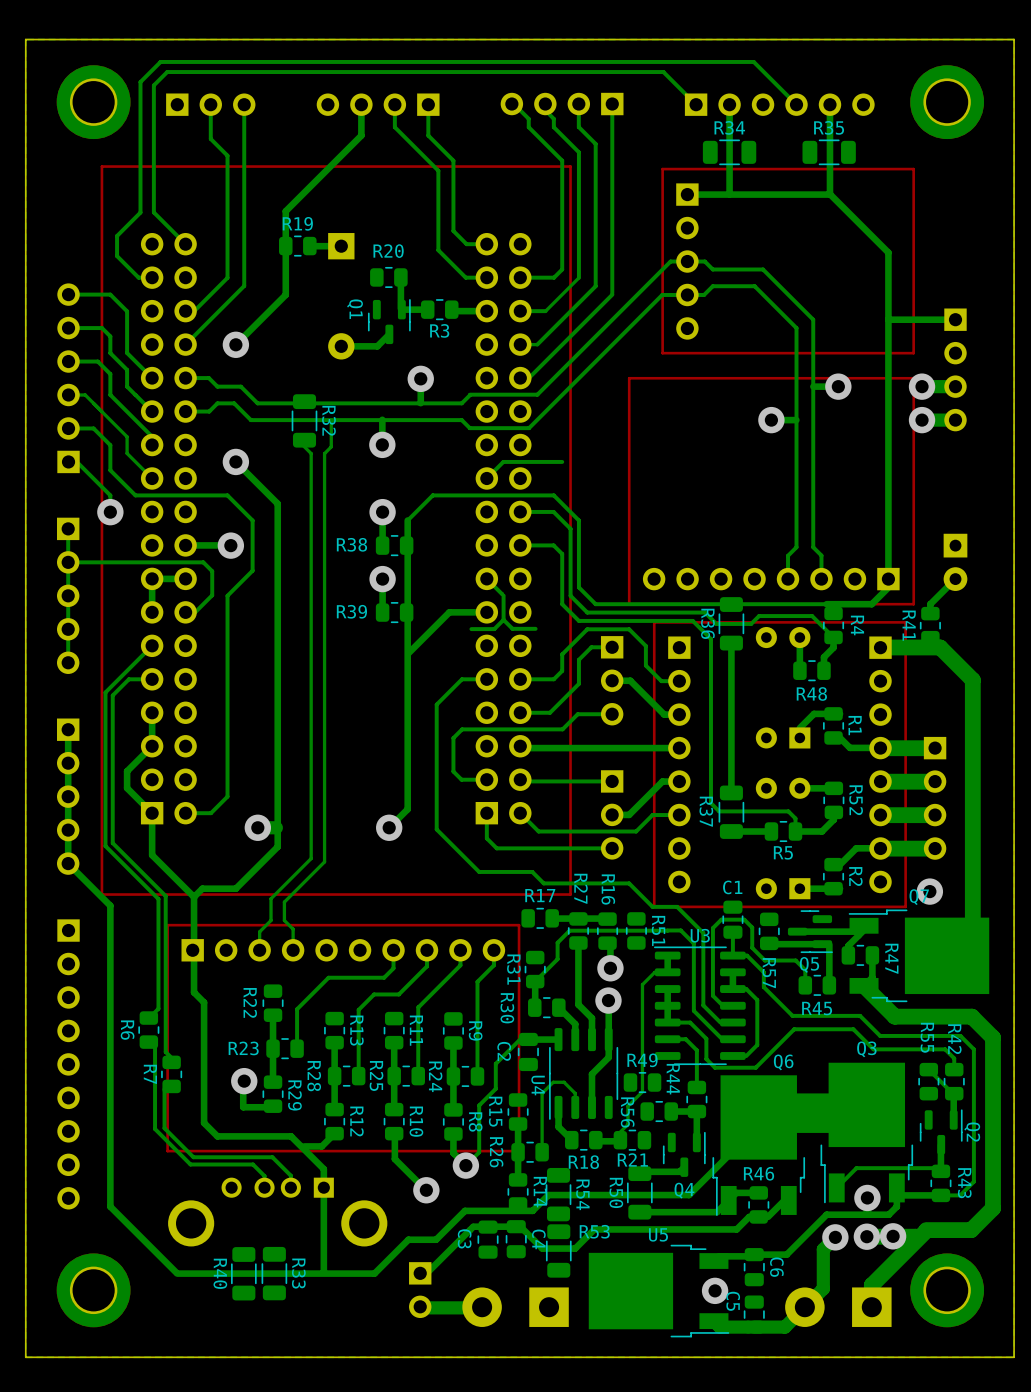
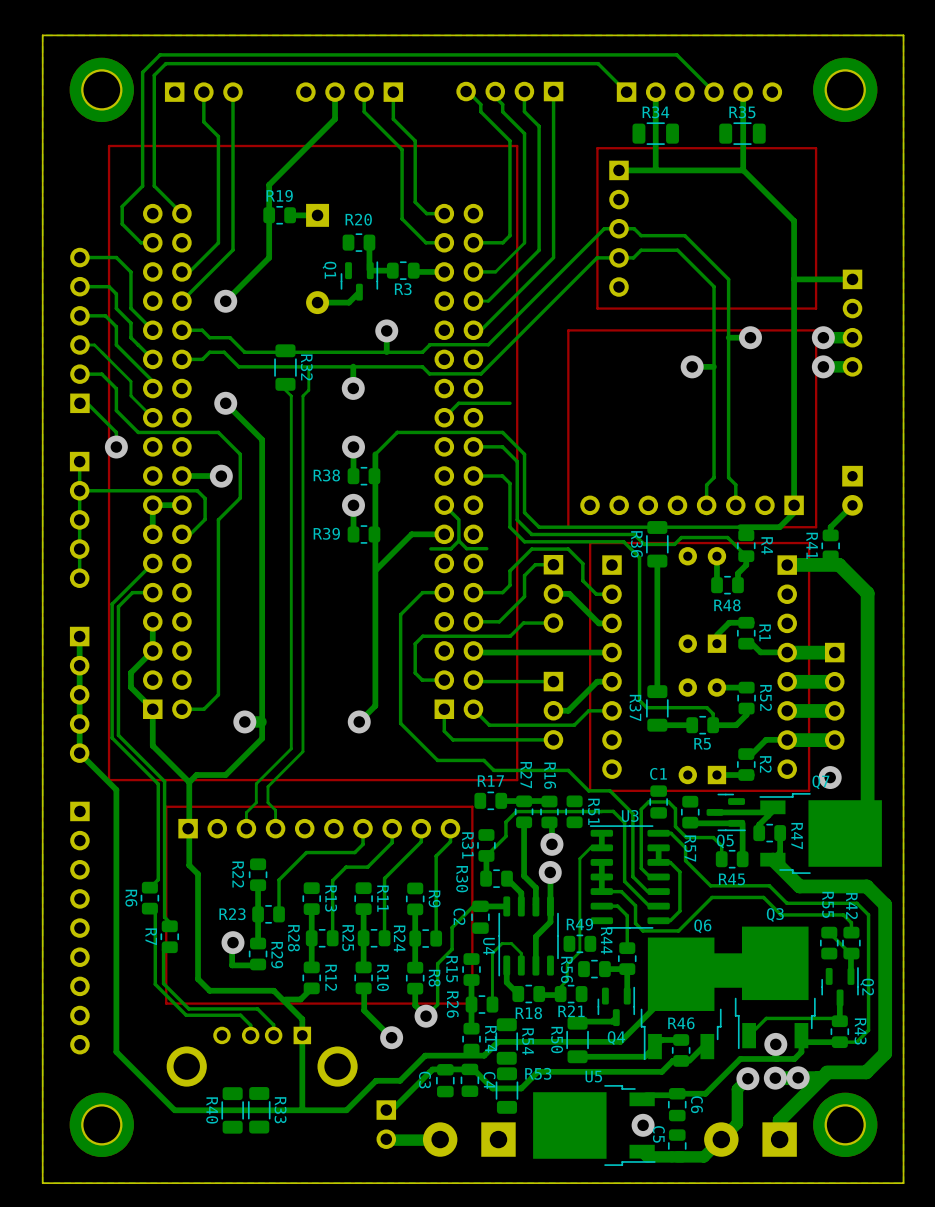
bottom track: (732, 932) (732, 955) -> none

